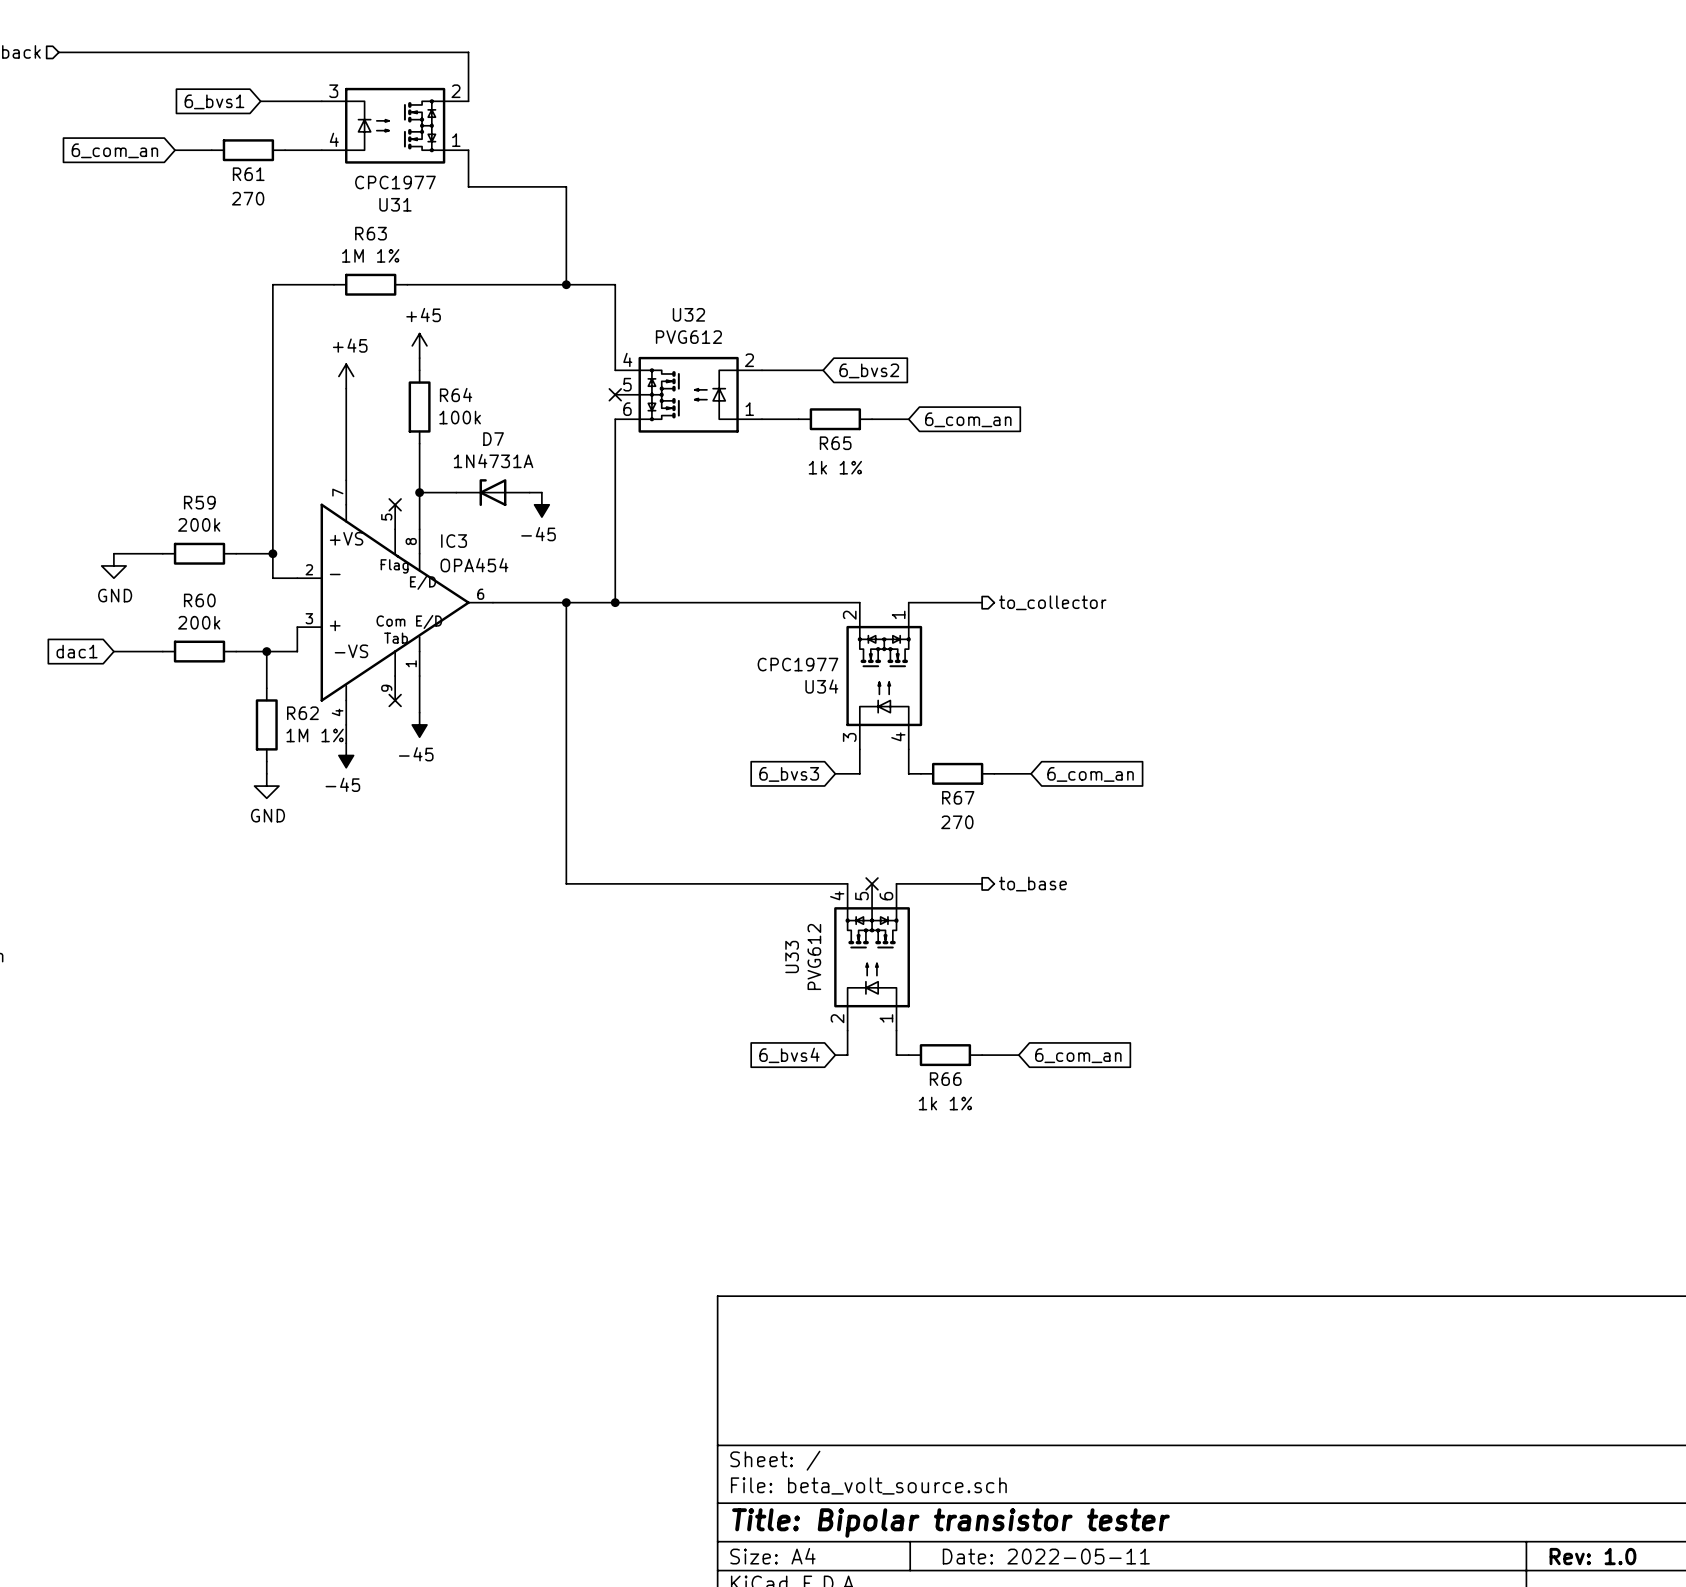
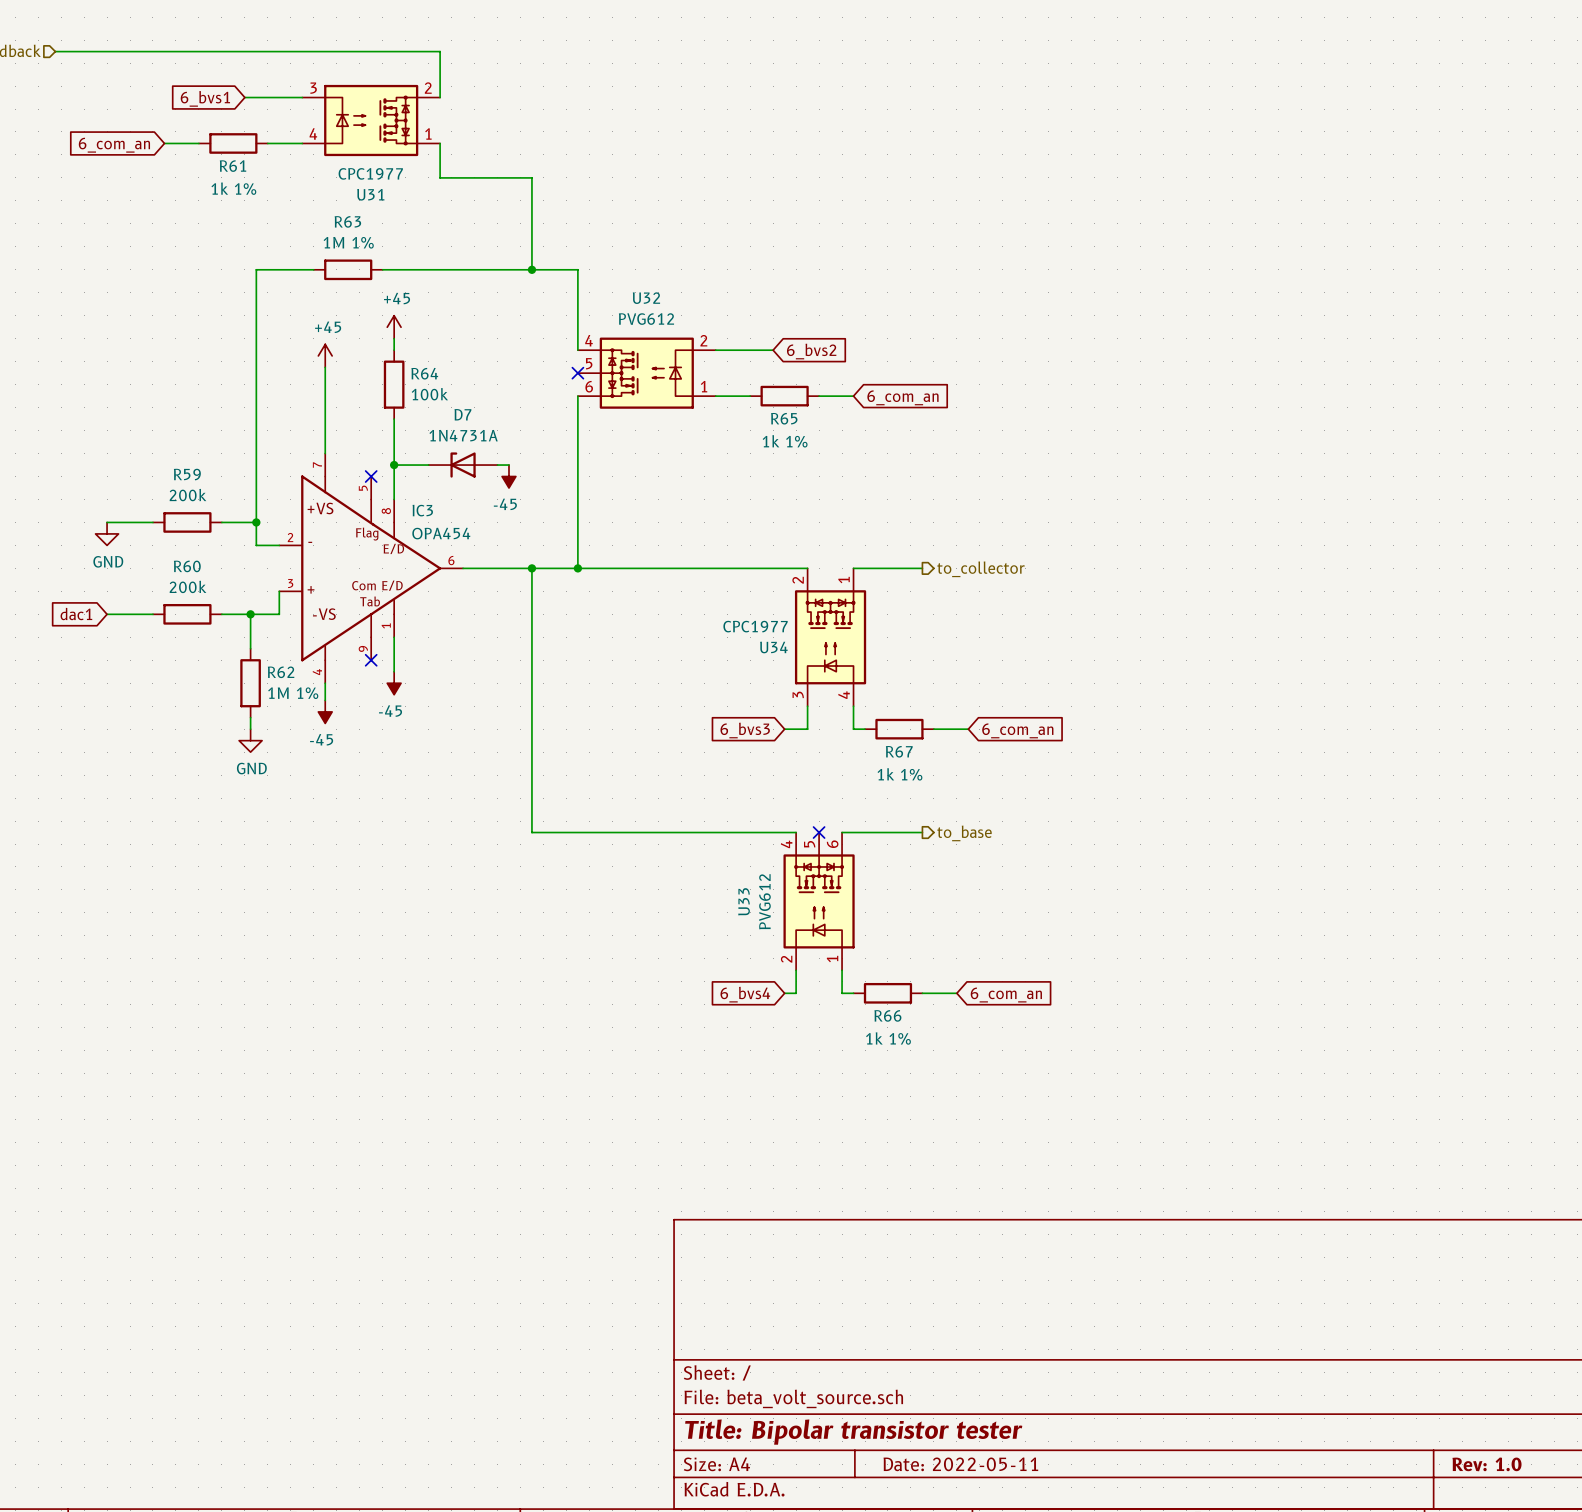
R61 value: 270 (248, 198) -> 1k 1% (233, 188)
R67 value: 270 (957, 822) -> 1k 1% (899, 774)

